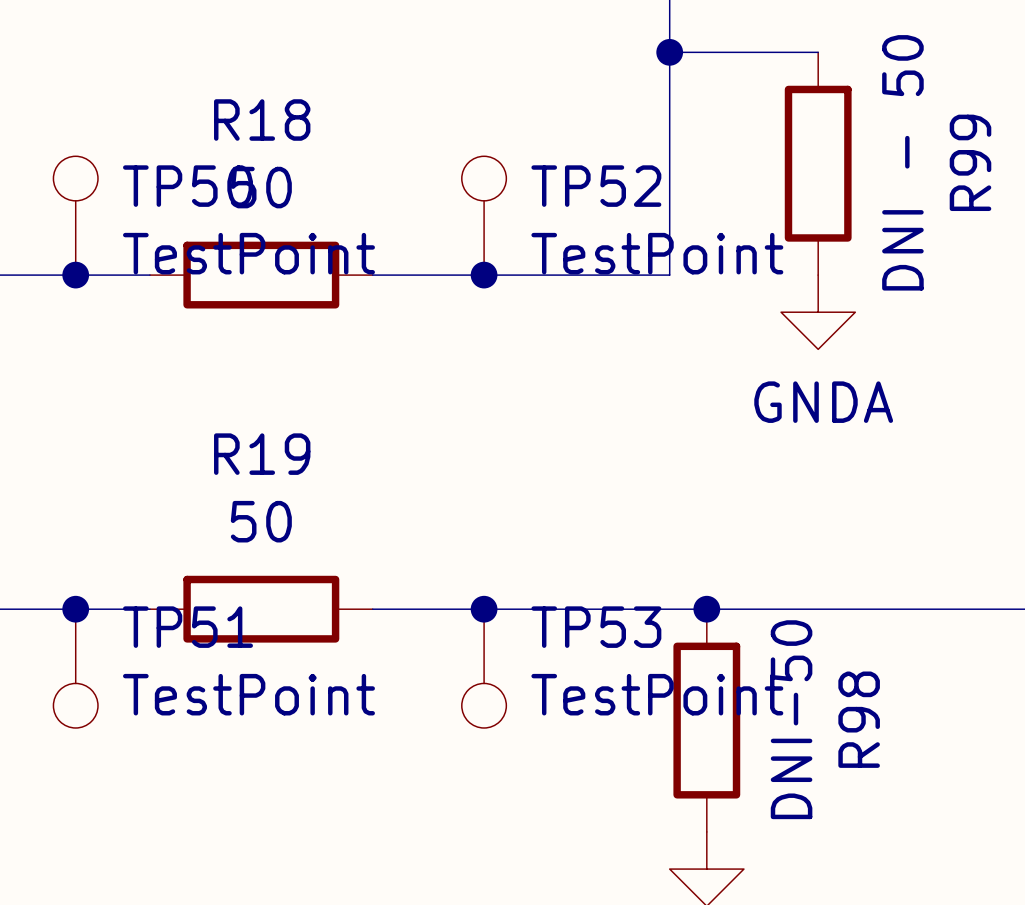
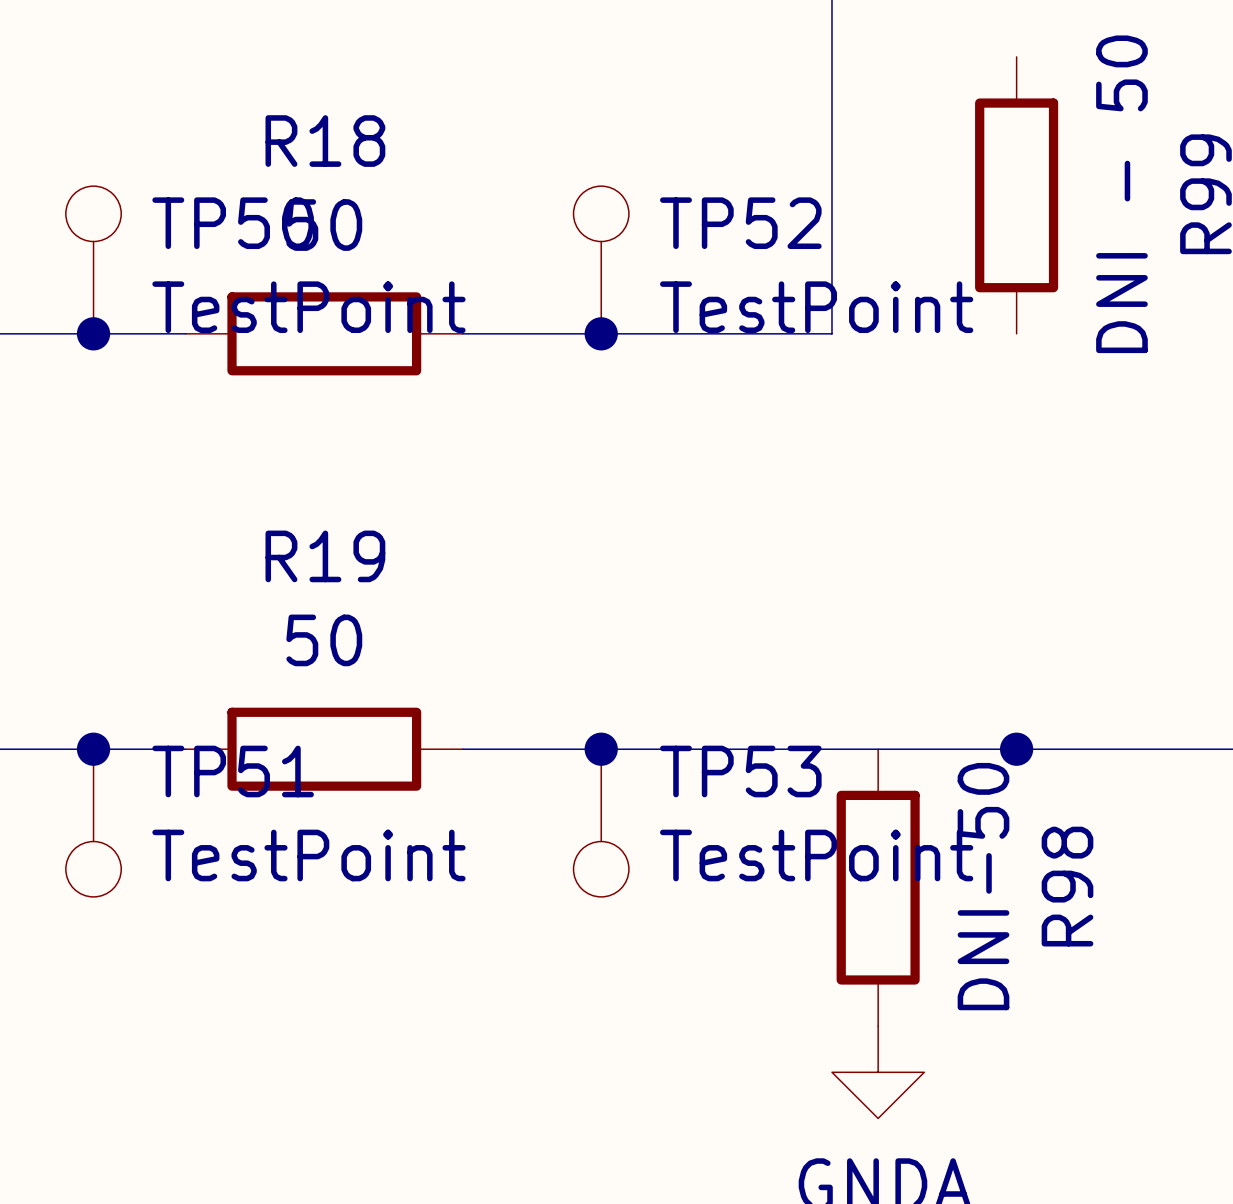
wire: (669, 52) (818, 52) -> none
junction: (669, 52) -> none
power symbol: GNDA (818, 312) -> none
junction position: (706, 609) -> (1016, 749)

